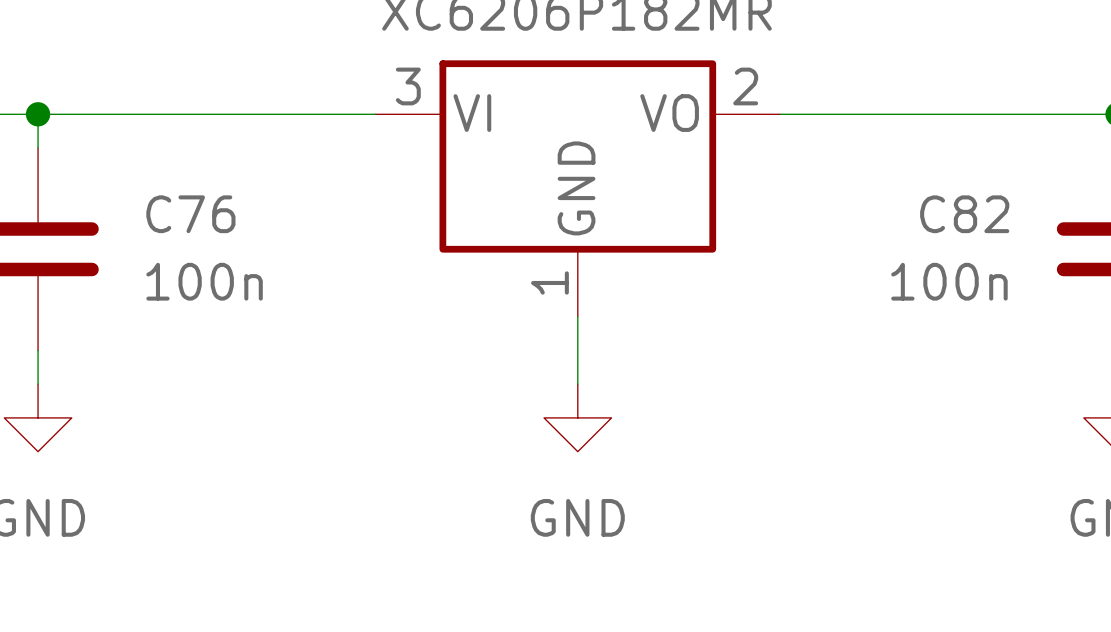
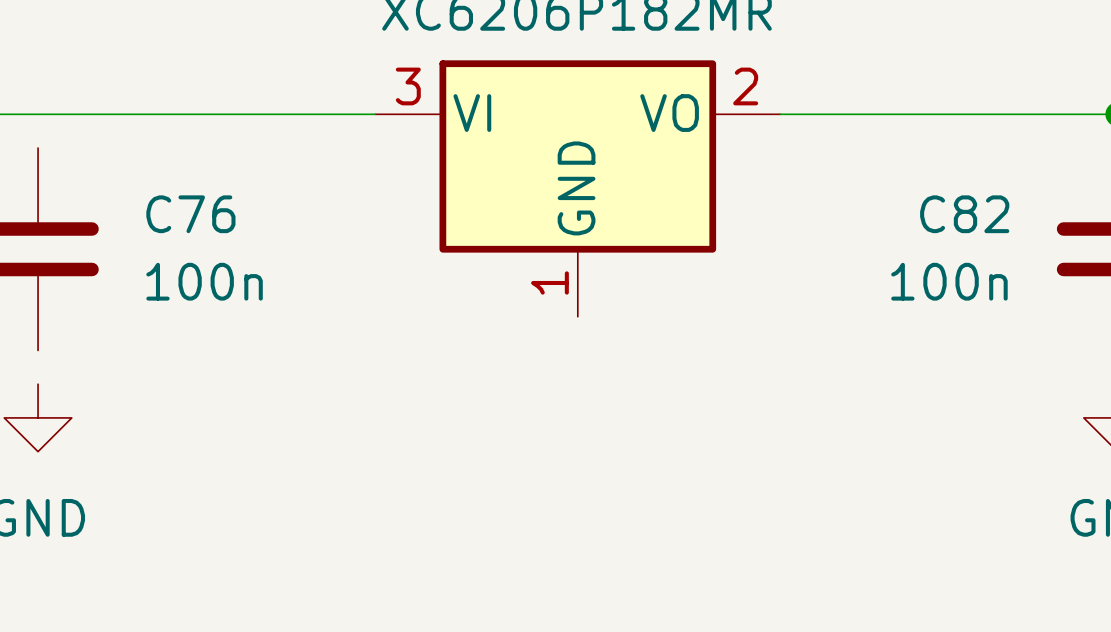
wire: (38, 114) (38, 148) -> none
junction: (38, 114) -> none
wire: (577, 316) (577, 384) -> none
wire: (38, 350) (38, 384) -> none
power symbol: GND (577, 417) -> none

